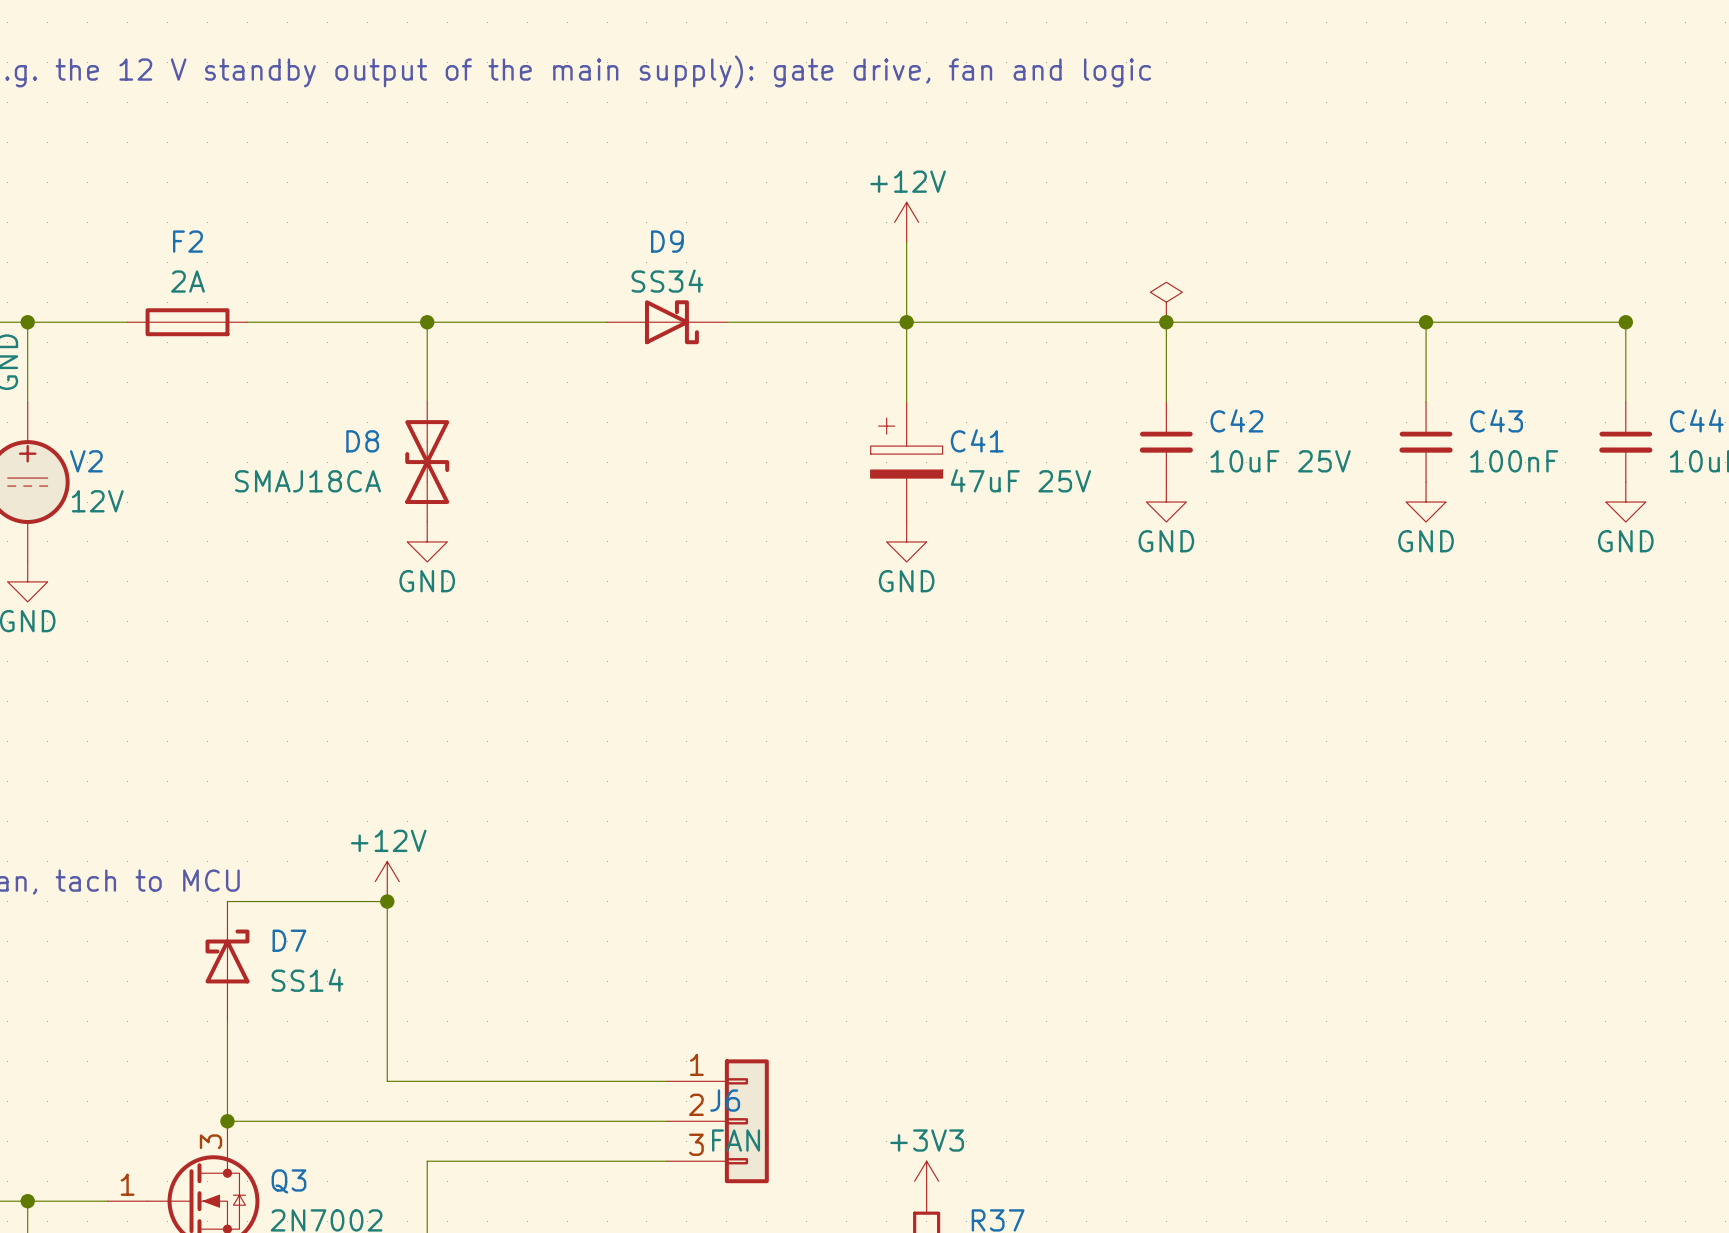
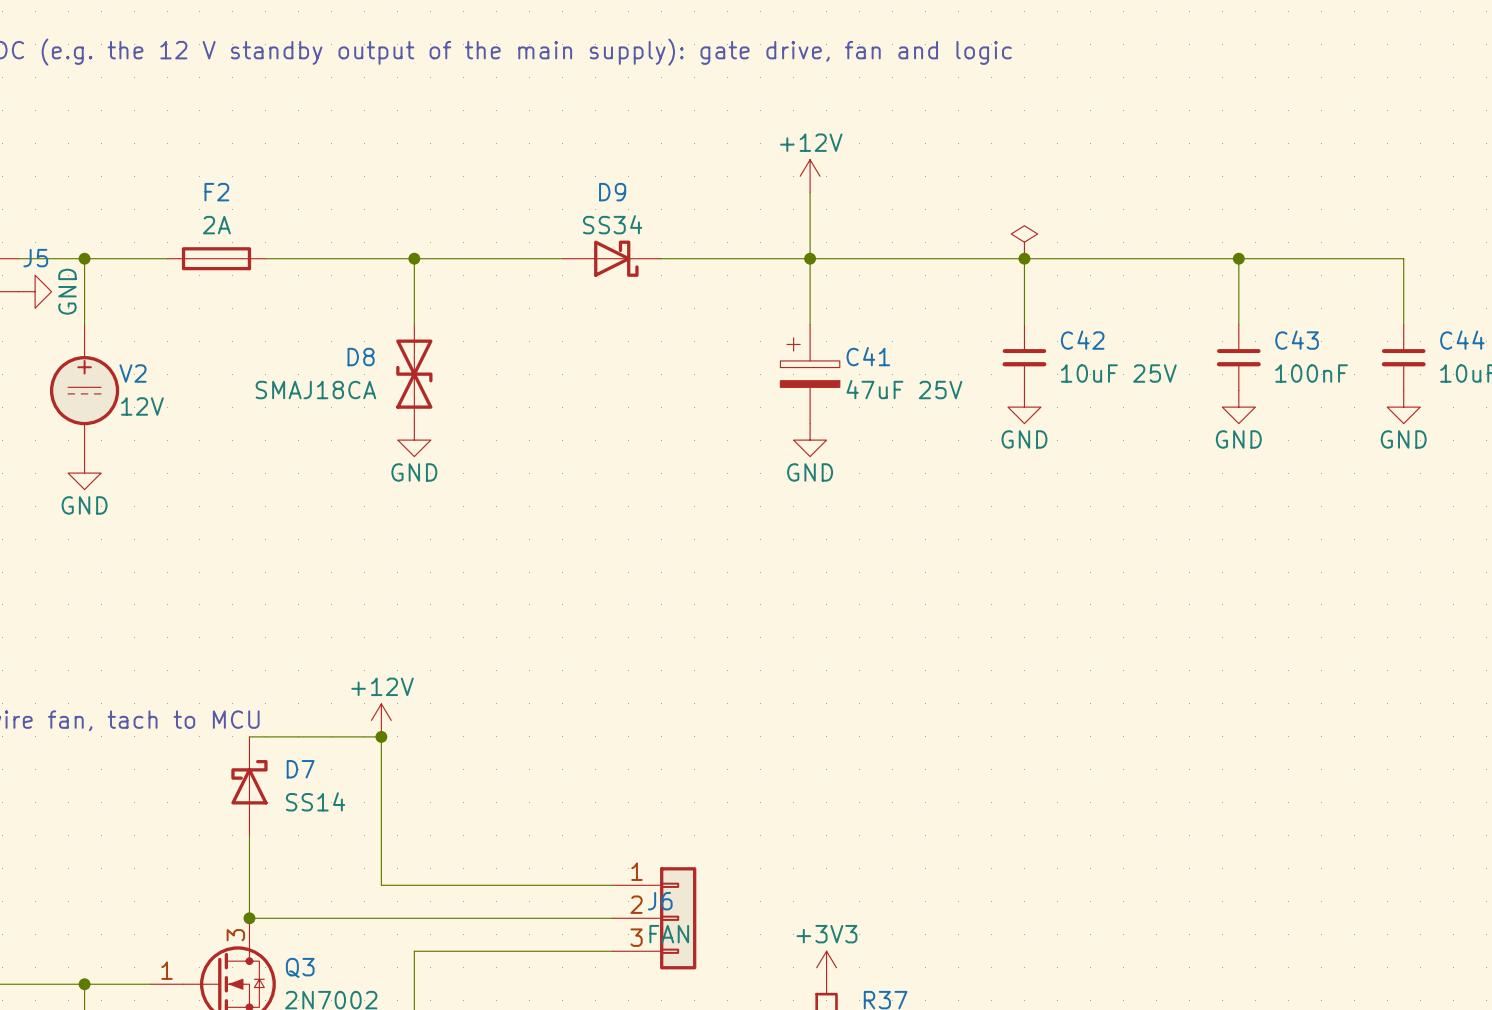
junction: (1625, 322) -> none

